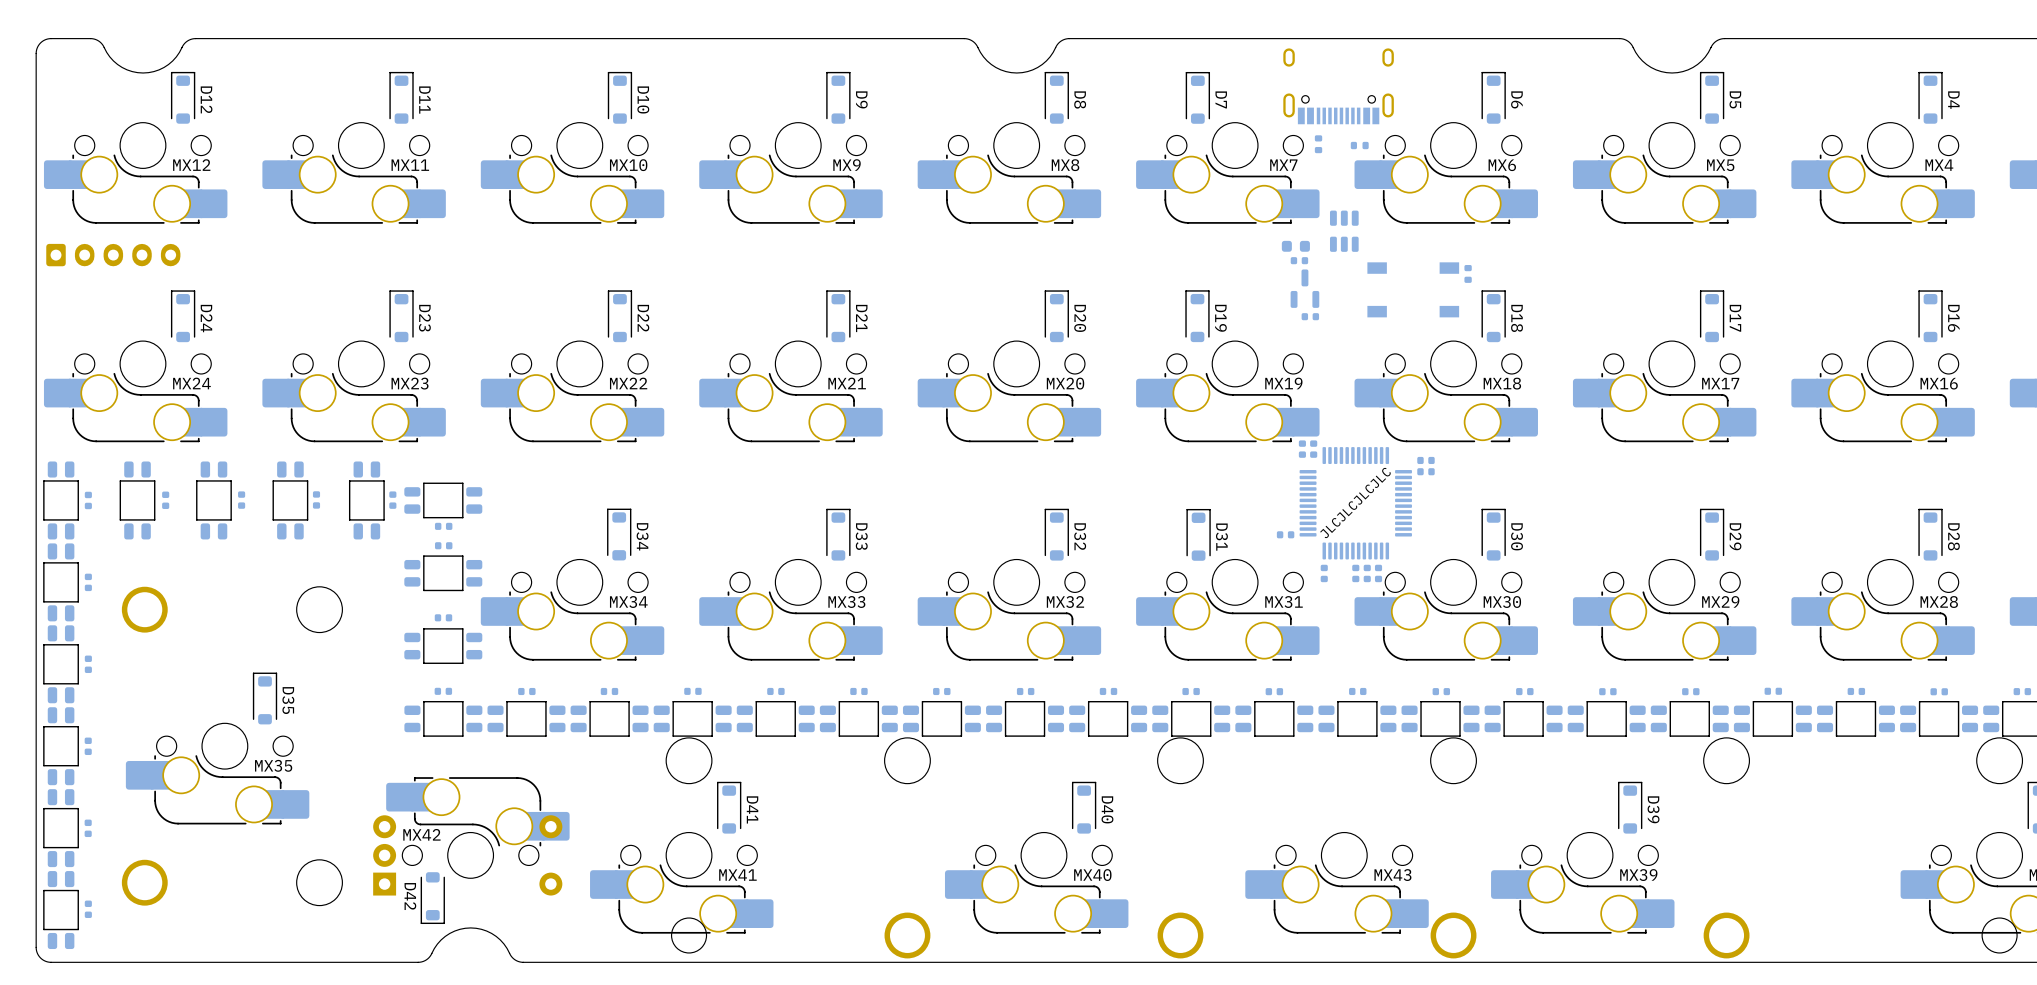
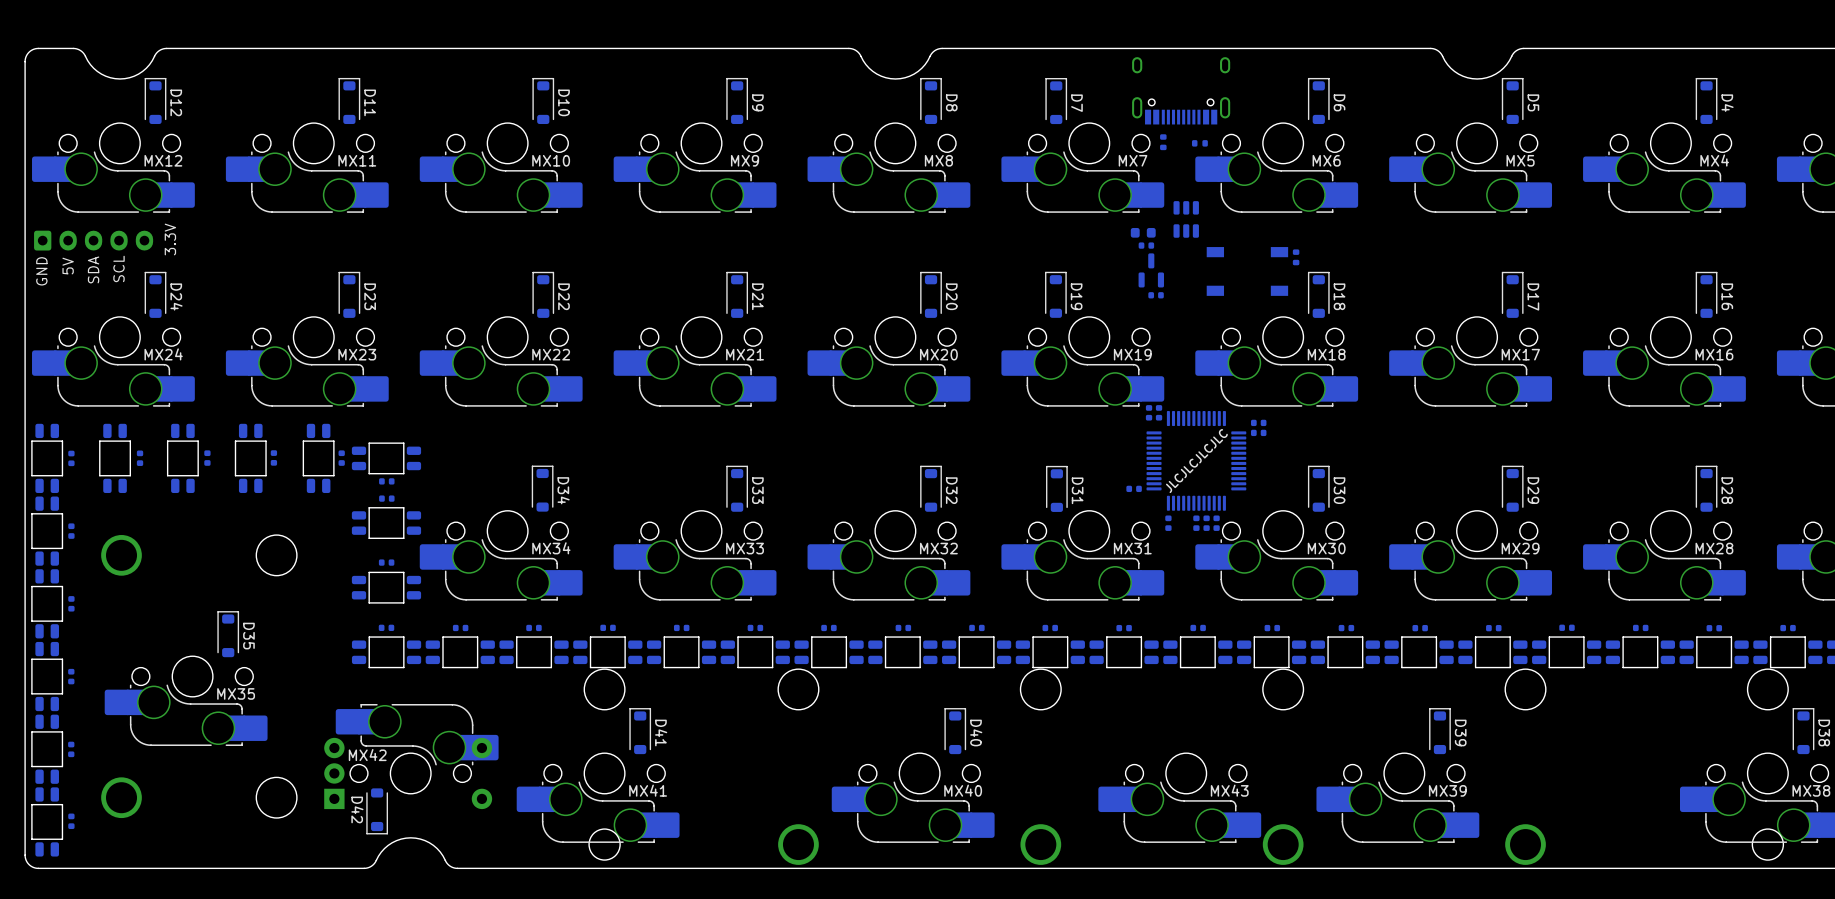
text: none -> 3.3V (170, 239)
text: none -> 5V (68, 266)
text: none -> SCL (119, 268)
text: none -> SDA (93, 269)
text: none -> GND (41, 271)

